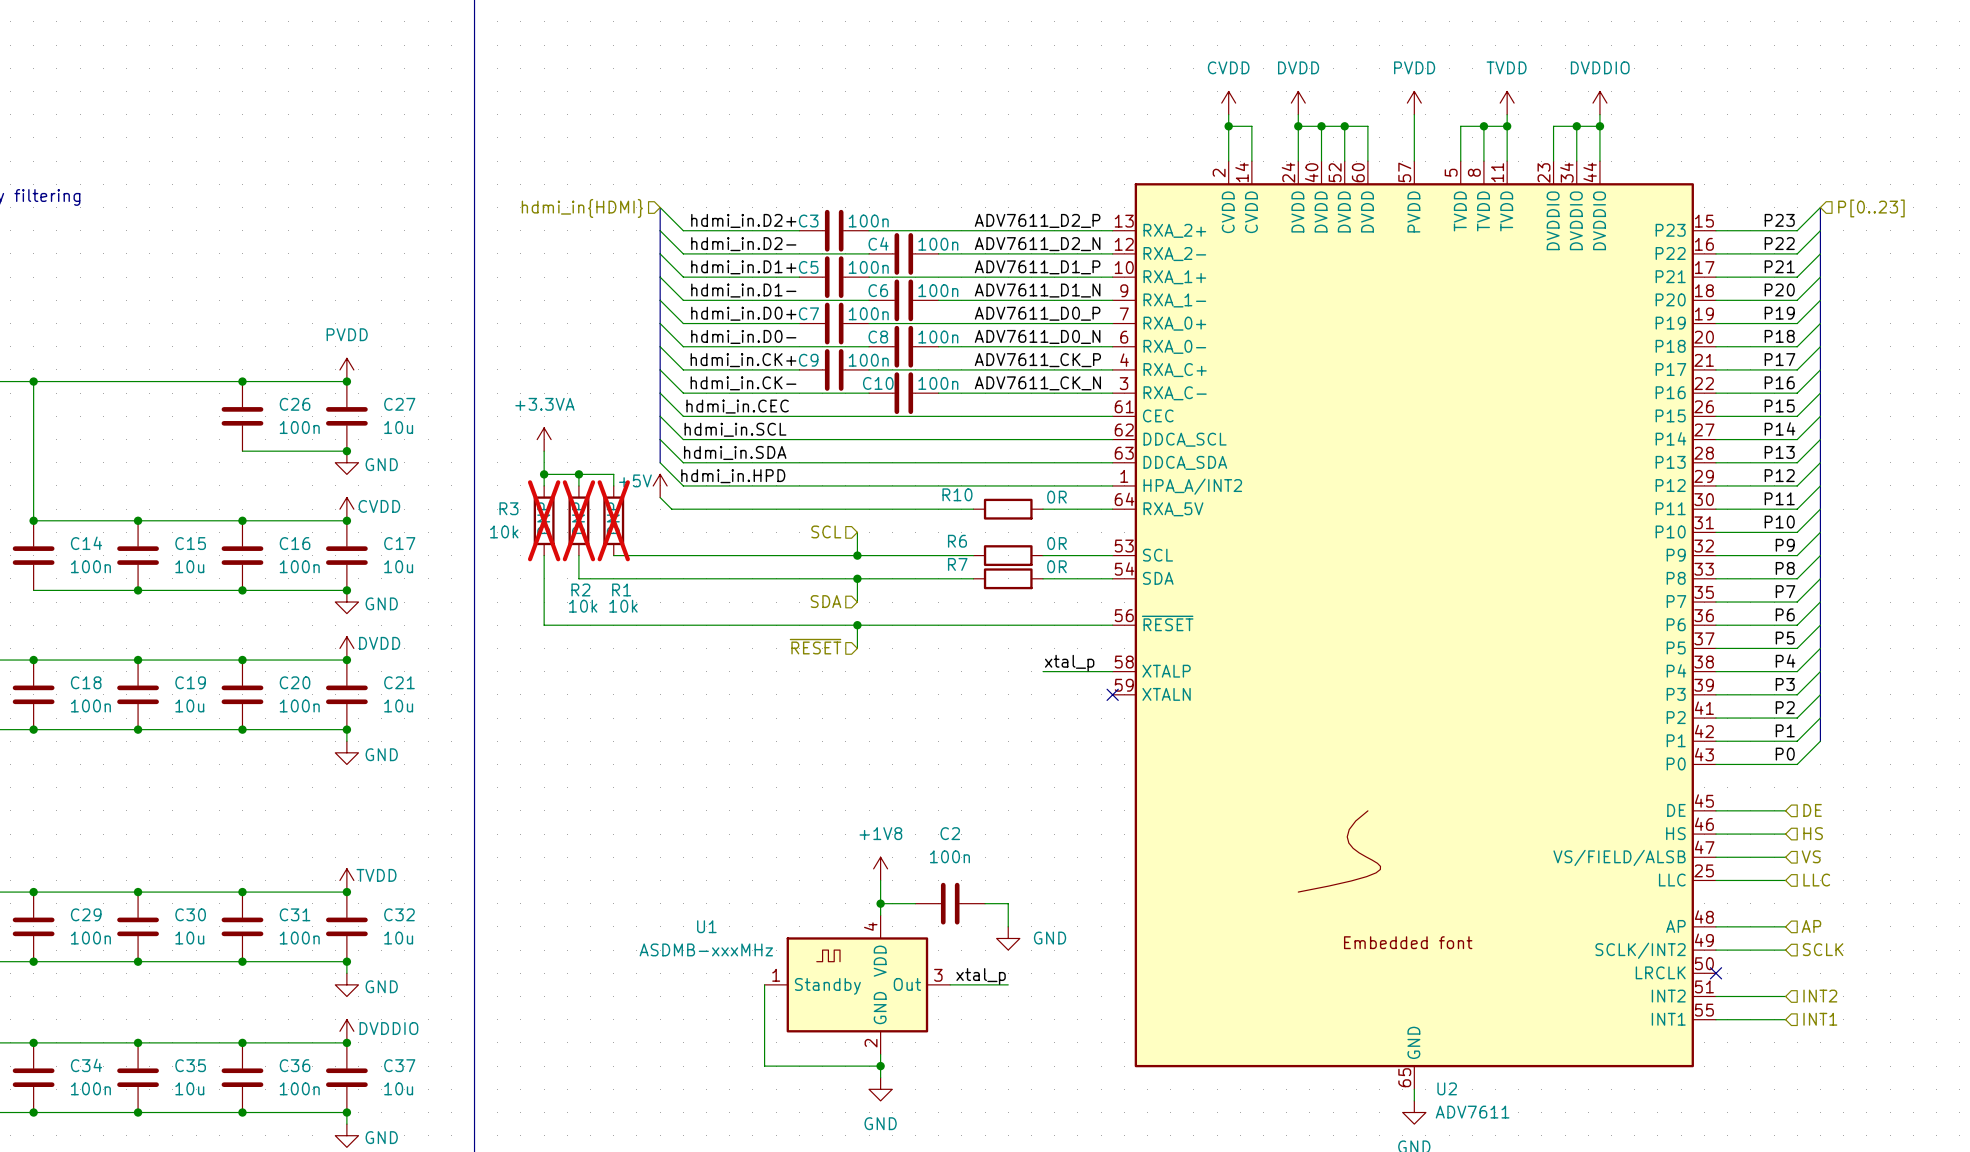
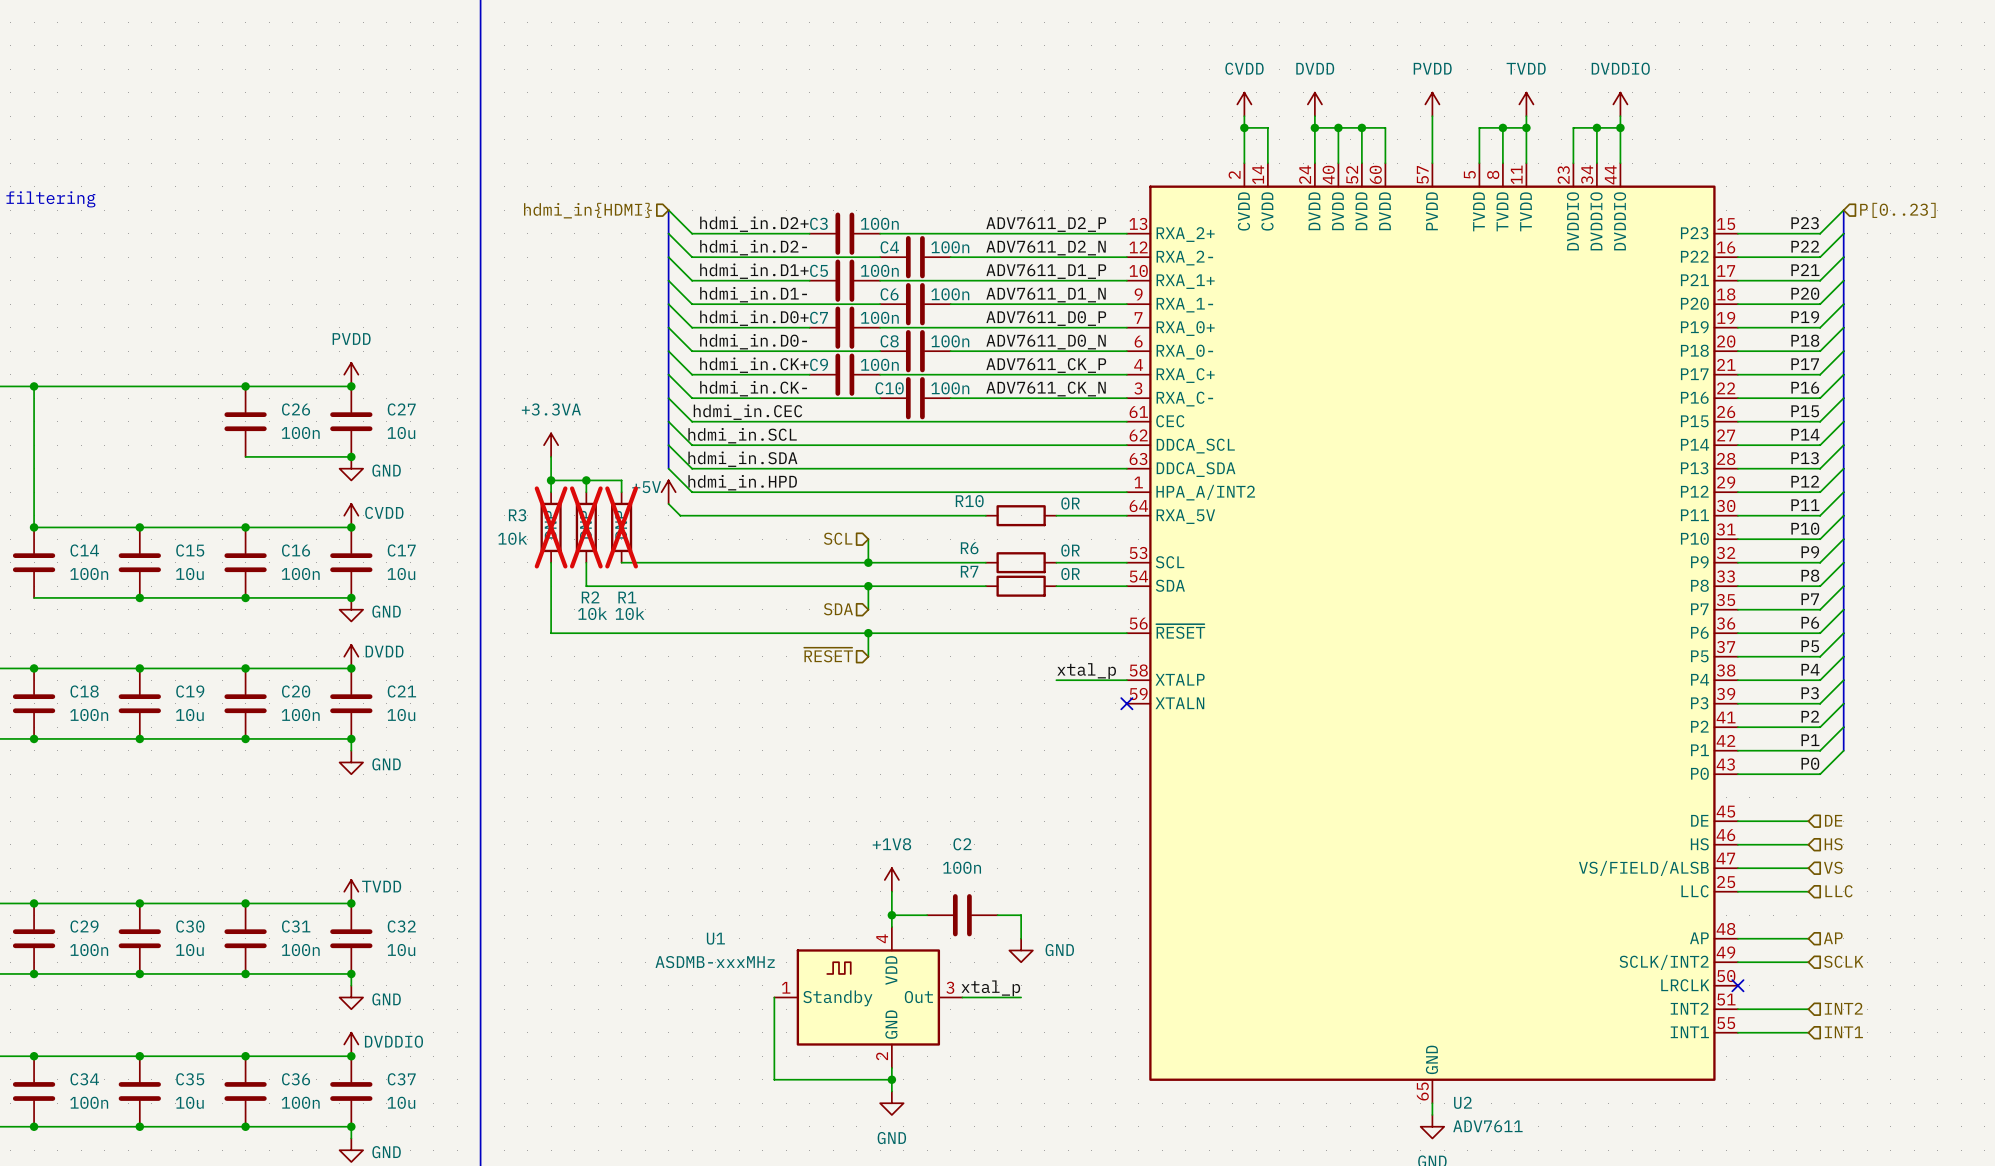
U2 symbol: [1112, 161, 1716, 1090] -> [1126, 163, 1738, 1104]

